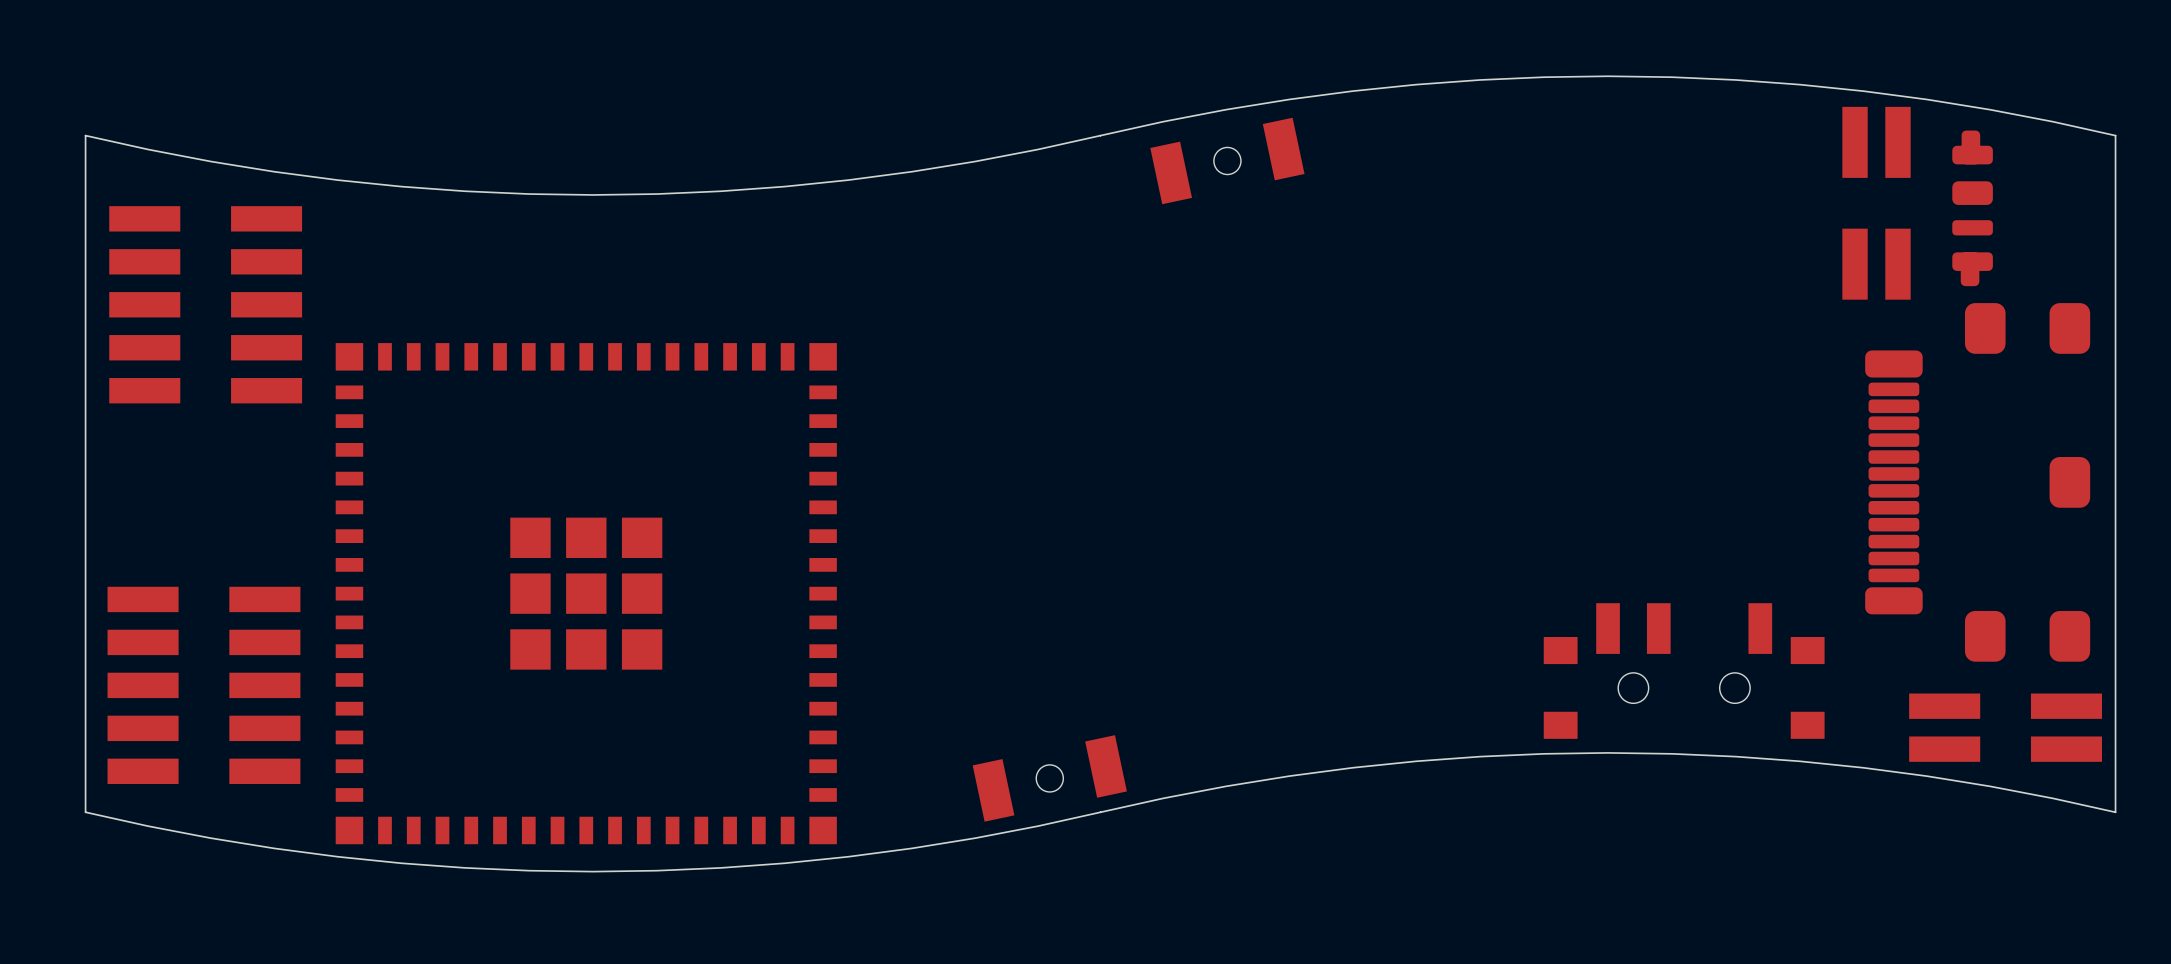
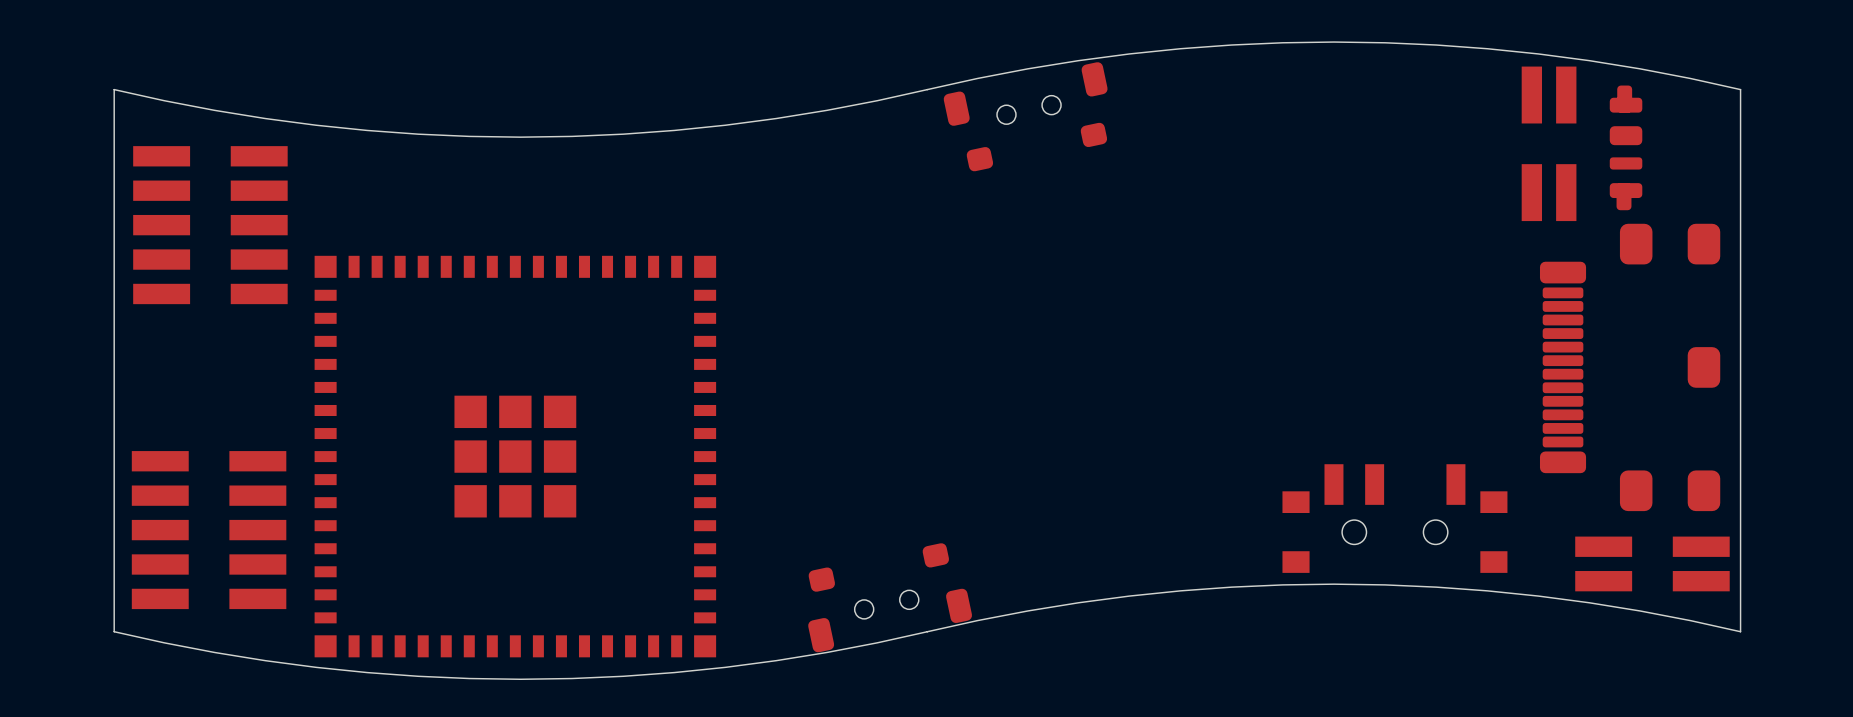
part footprint: [1150, 117, 1305, 205] -> [943, 62, 1108, 172]
part footprint: [972, 735, 1127, 822] -> [808, 543, 973, 653]

